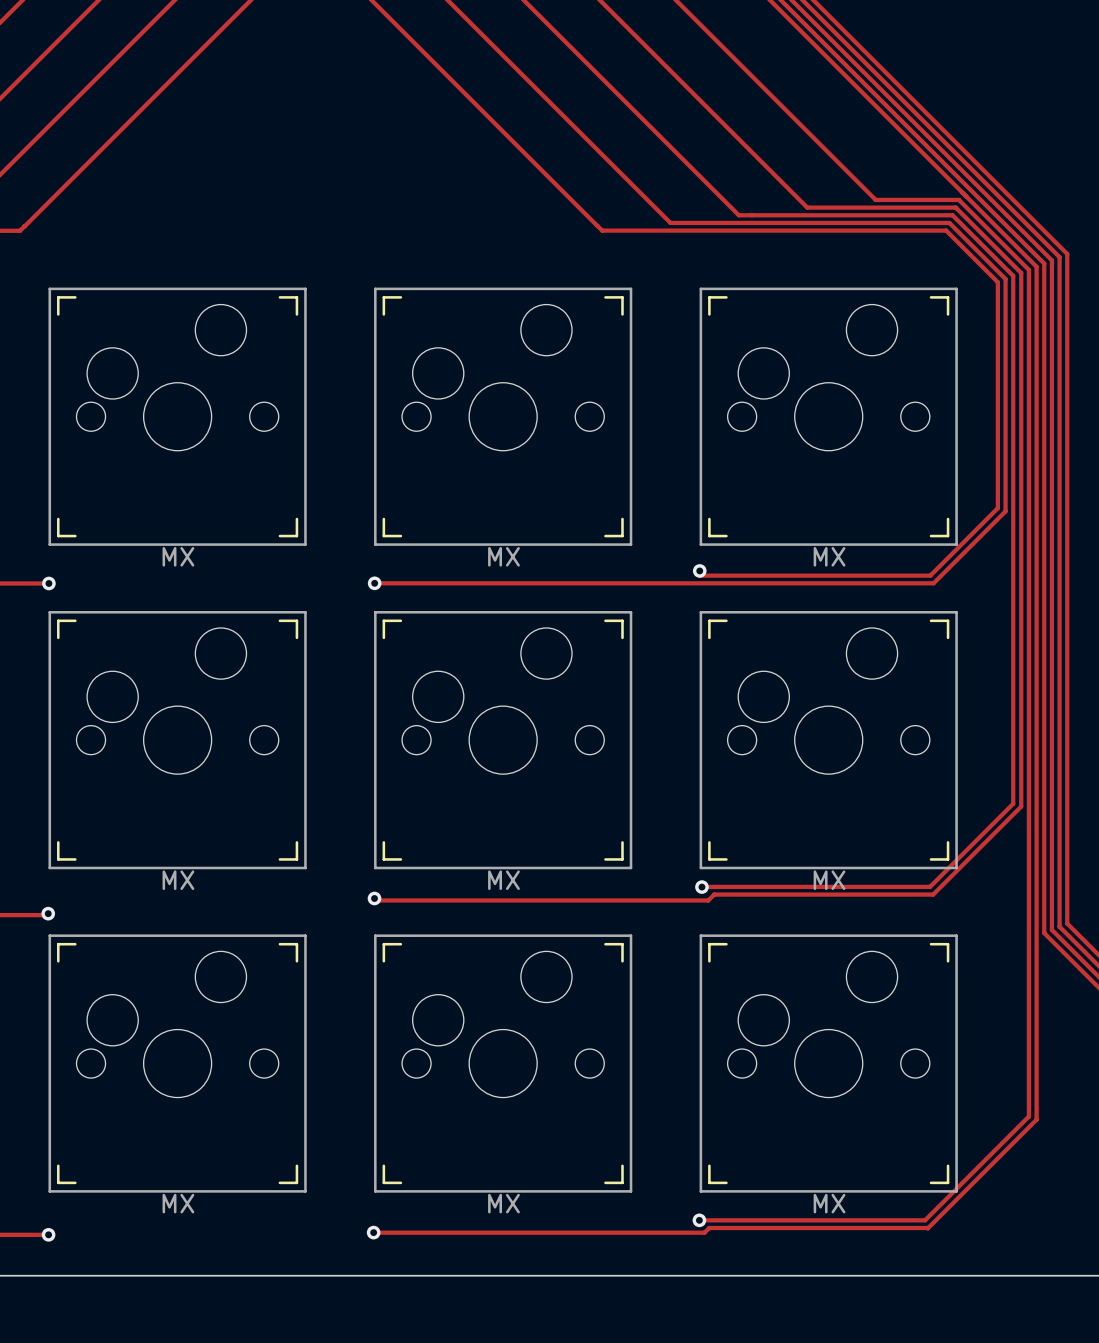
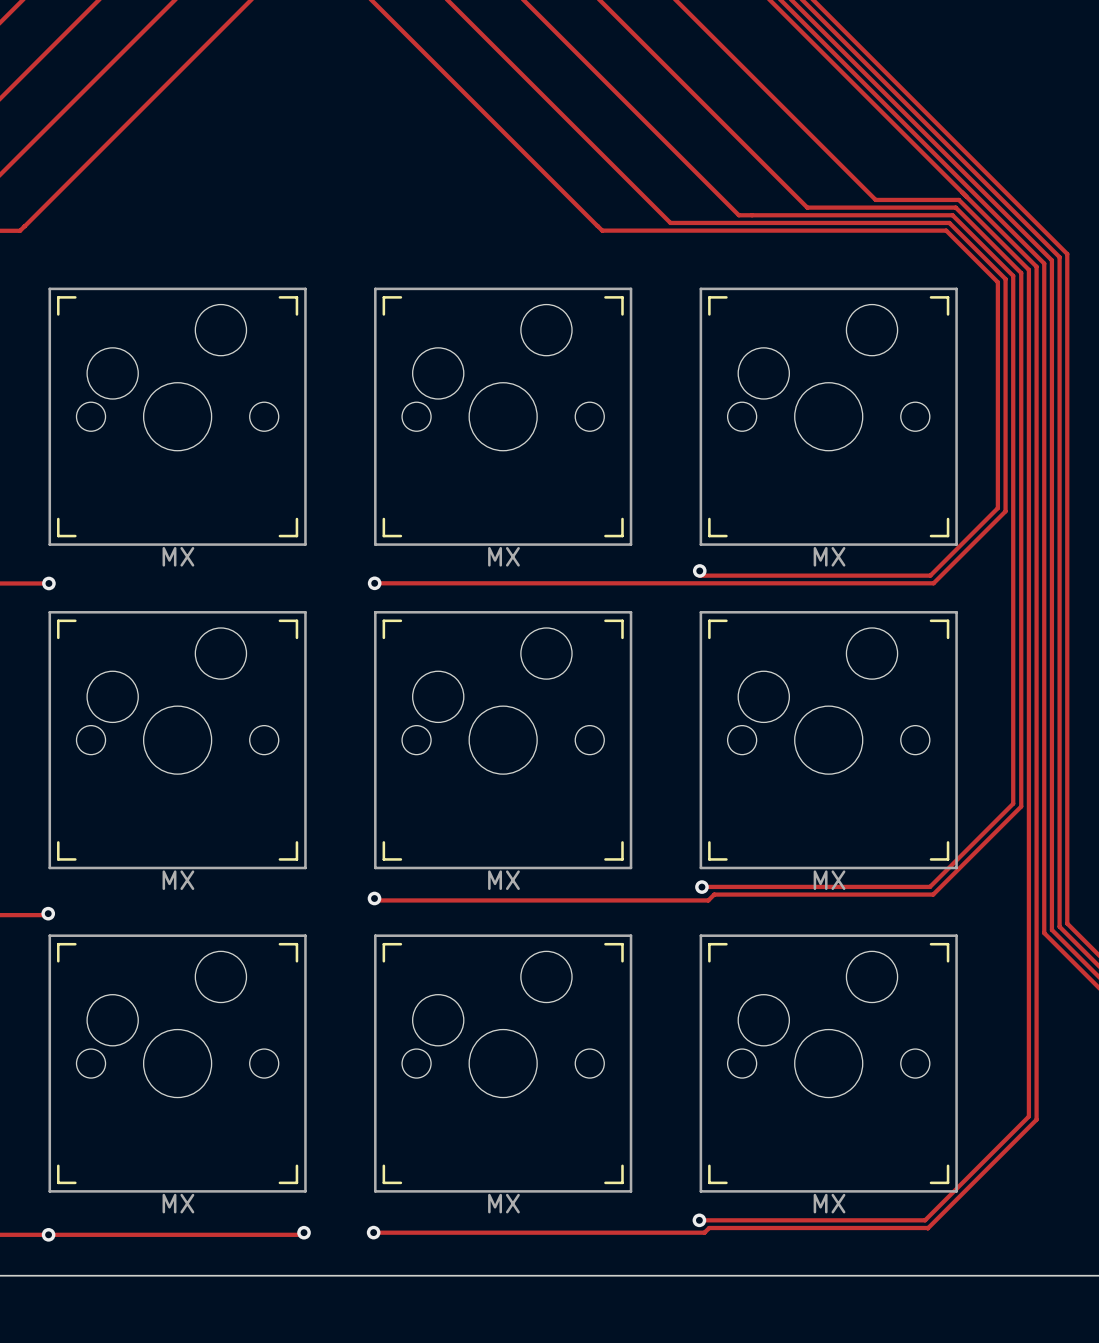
track: none -> (304, 1232) (301, 1234) (48, 1234)
via: none -> (304, 1232)

